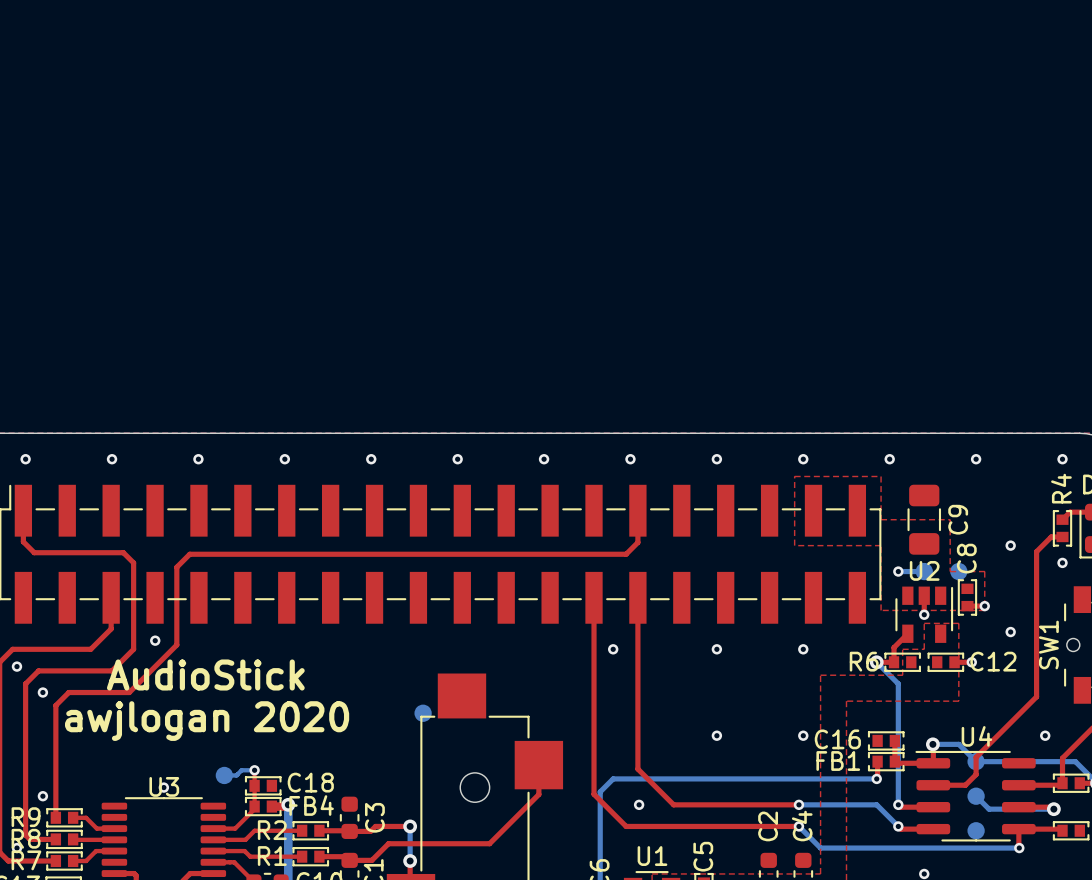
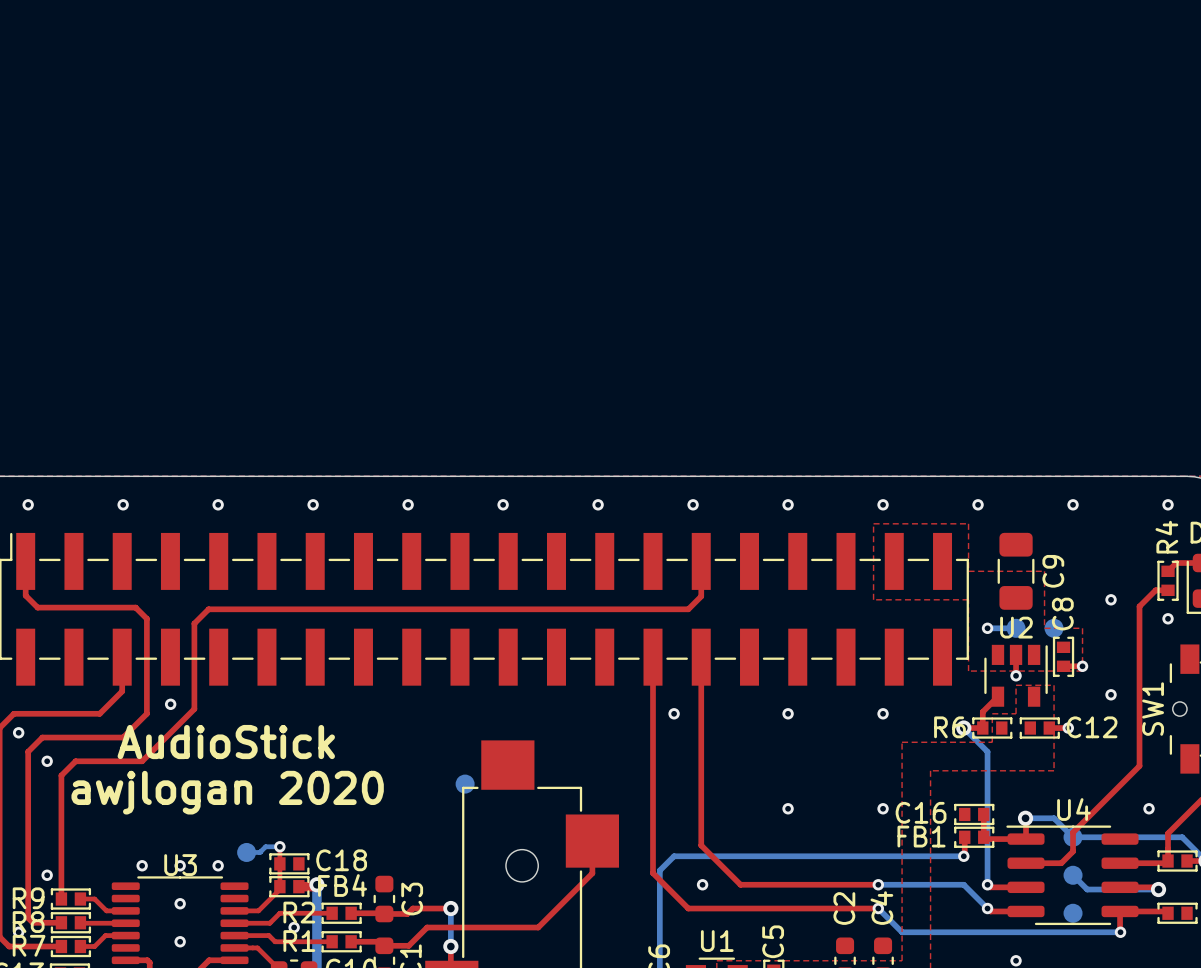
via: none -> (142, 865)
via: none -> (218, 865)
via: none -> (180, 903)
via: none -> (294, 927)
via: none -> (180, 941)

